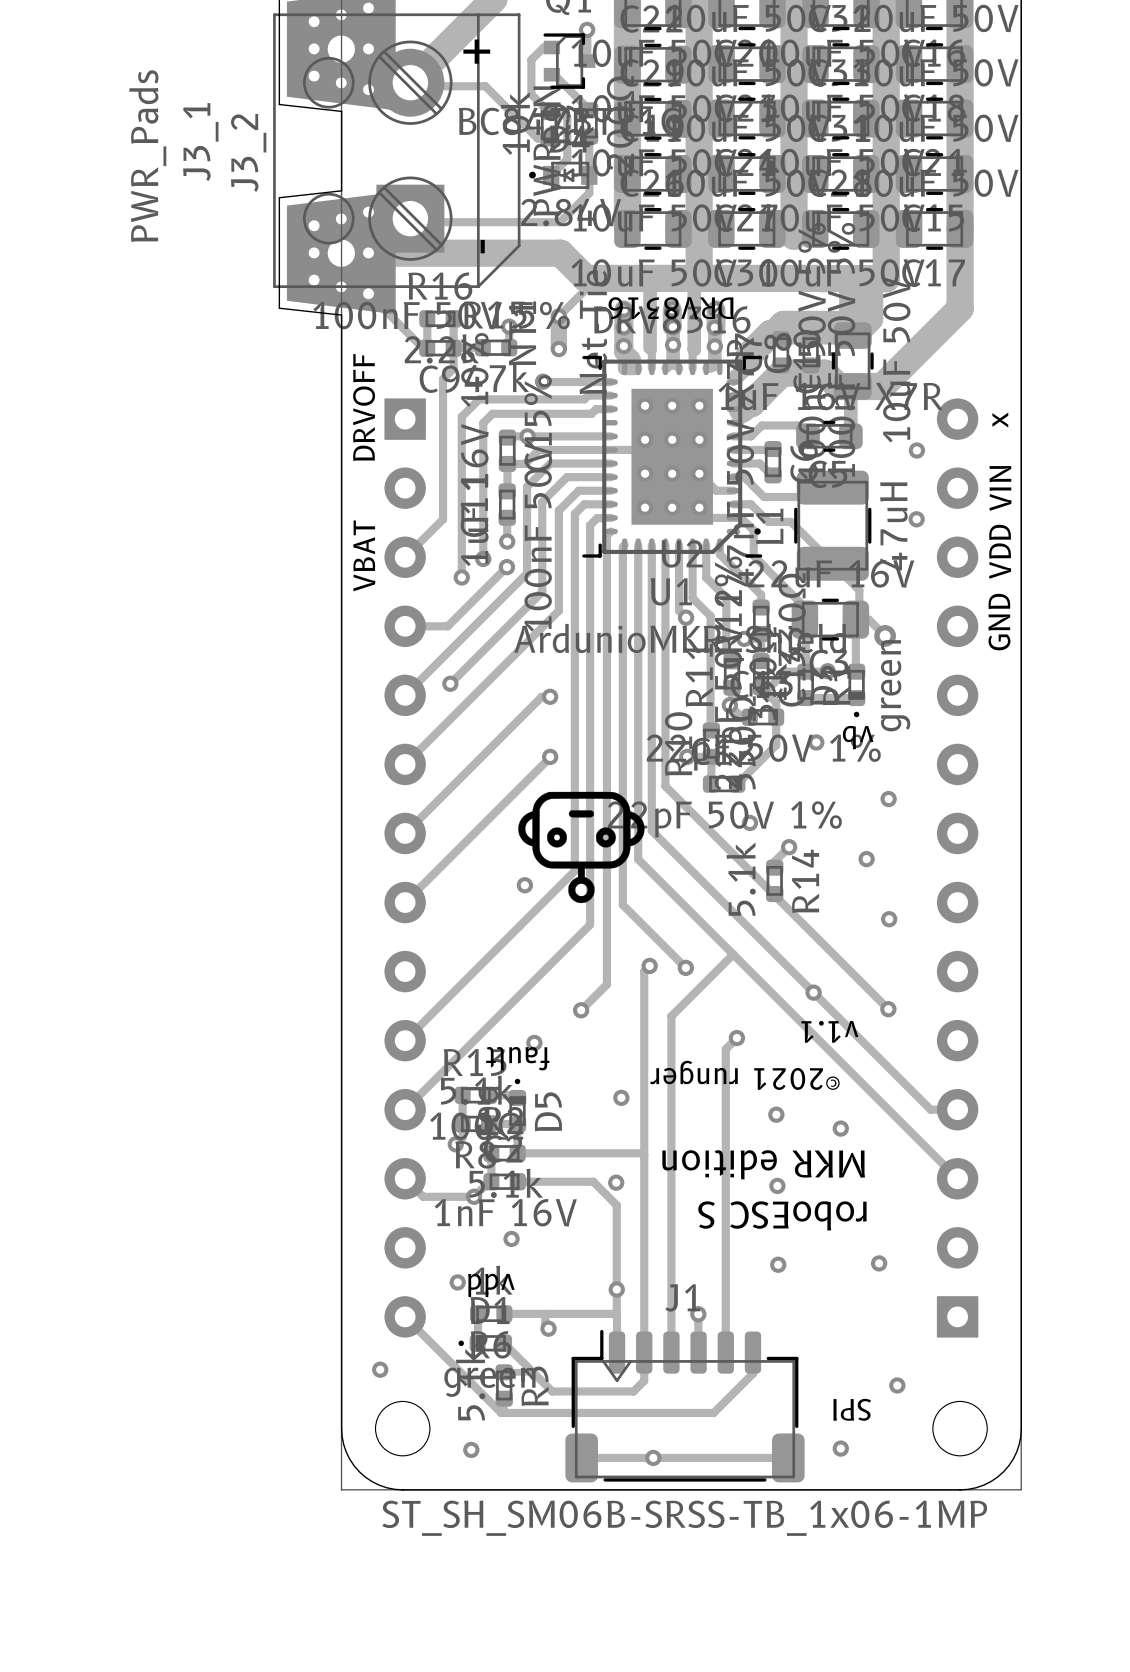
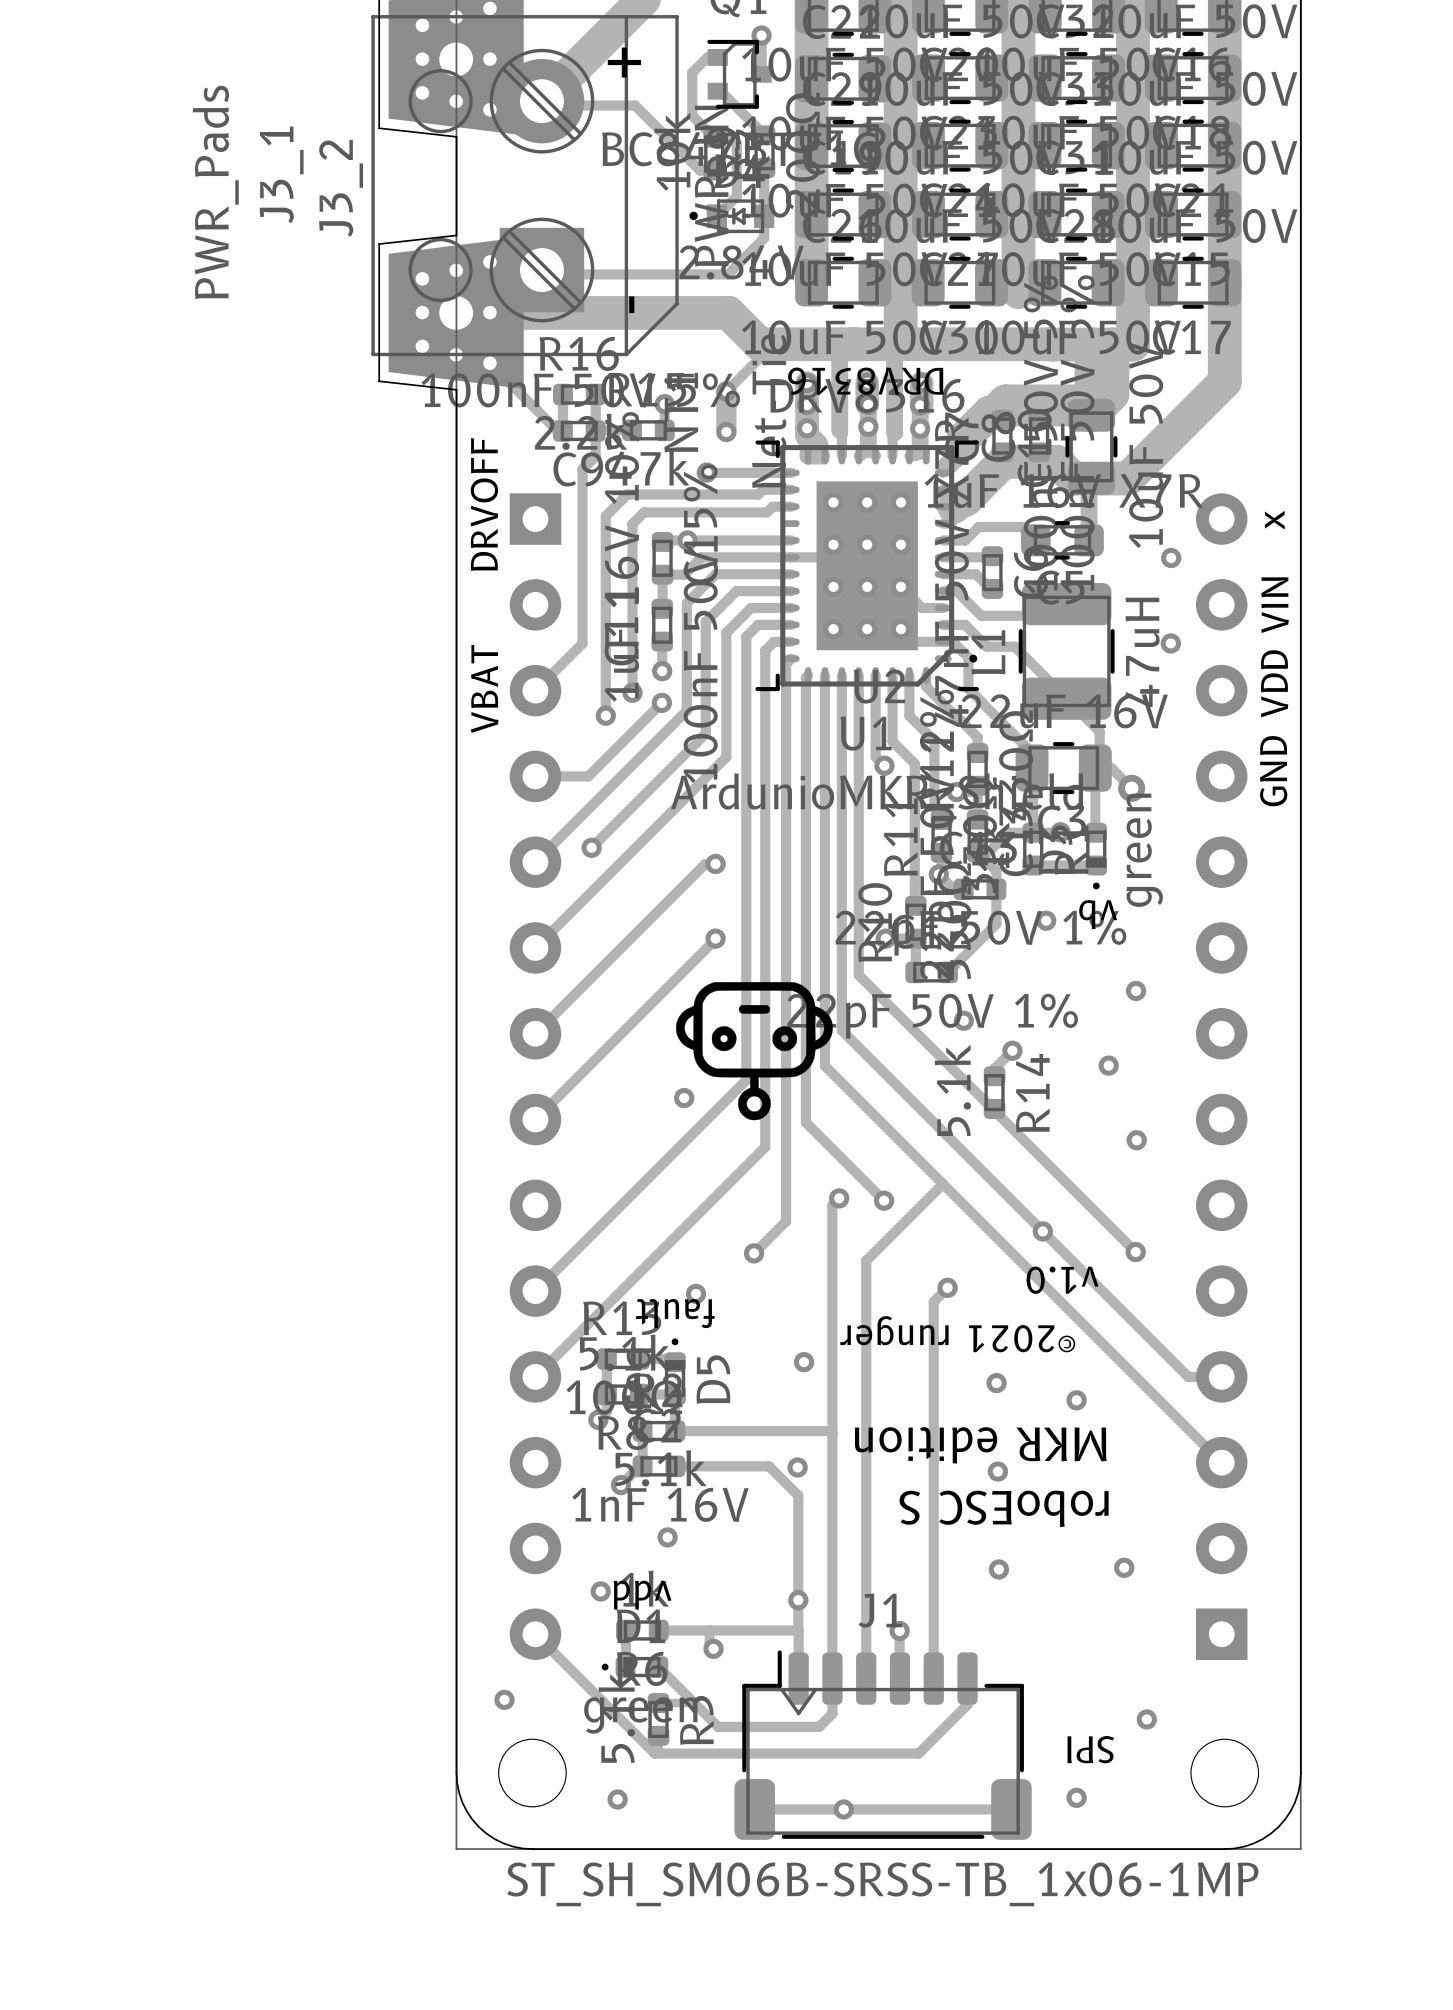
text: v1.1 (829, 1031) -> v1.0 (1062, 1280)
track: (405, 1178) (423, 1196) (474, 1196) -> none

